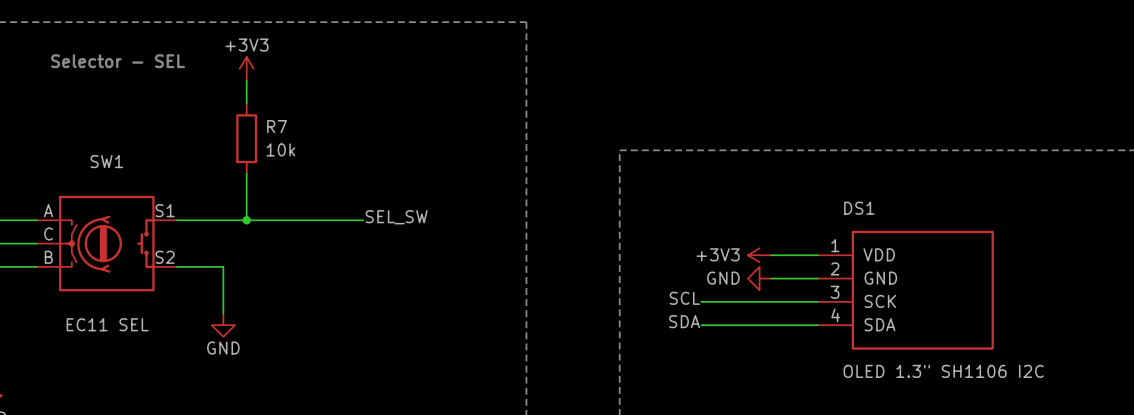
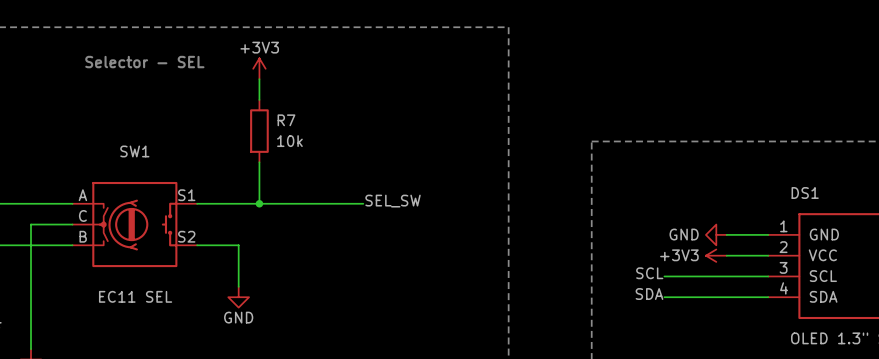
DS1 pin name: VDD (879, 254) -> GND (824, 234)
power symbol: +3V3 (759, 255) -> GND (716, 234)
power symbol: GND (759, 278) -> +3V3 (716, 255)
DS1 pin name: GND (880, 278) -> VCC (822, 255)
DS1 pin name: SCK (880, 301) -> SCL (823, 276)

